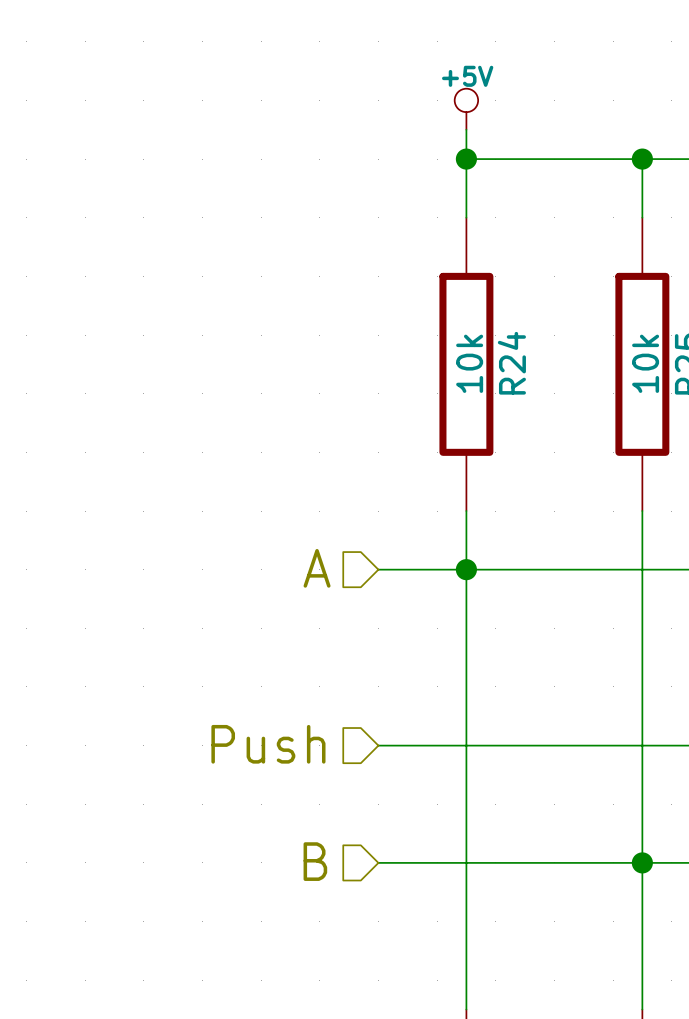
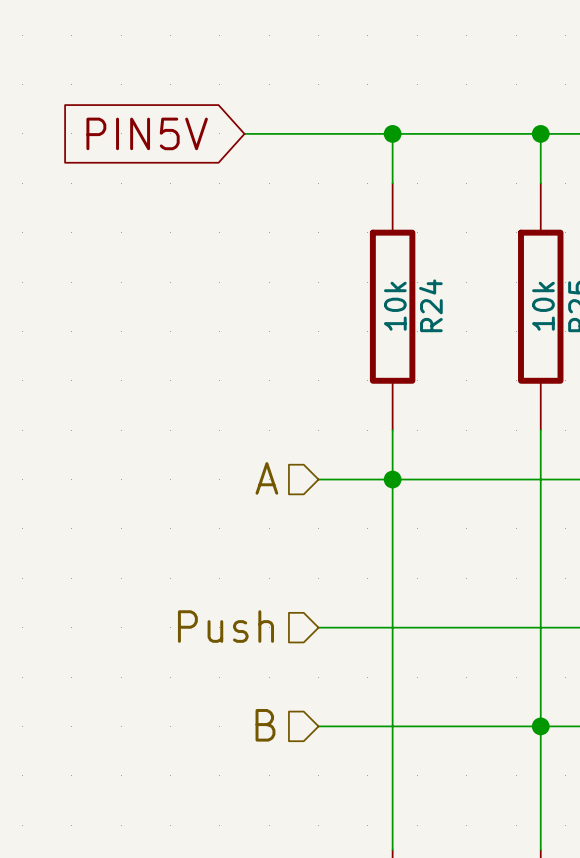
power symbol: +5V (466, 109) -> none
wire: (466, 129) (466, 159) -> (244, 133) (392, 133)
global label: none -> PIN5V (147, 133)

